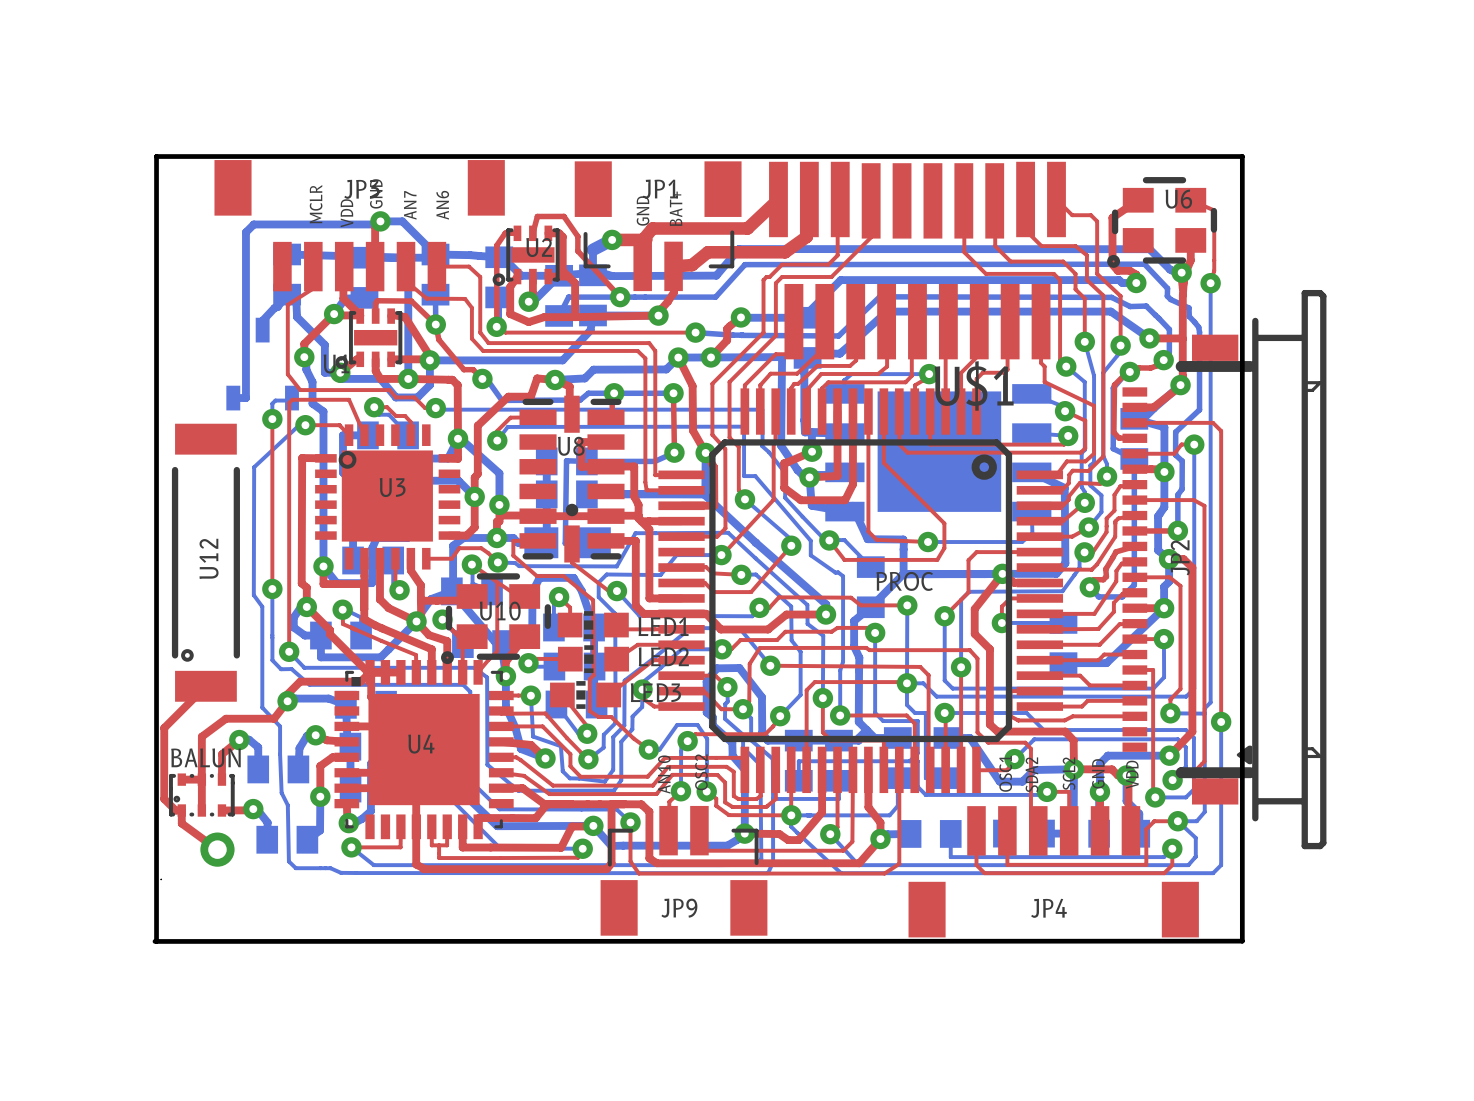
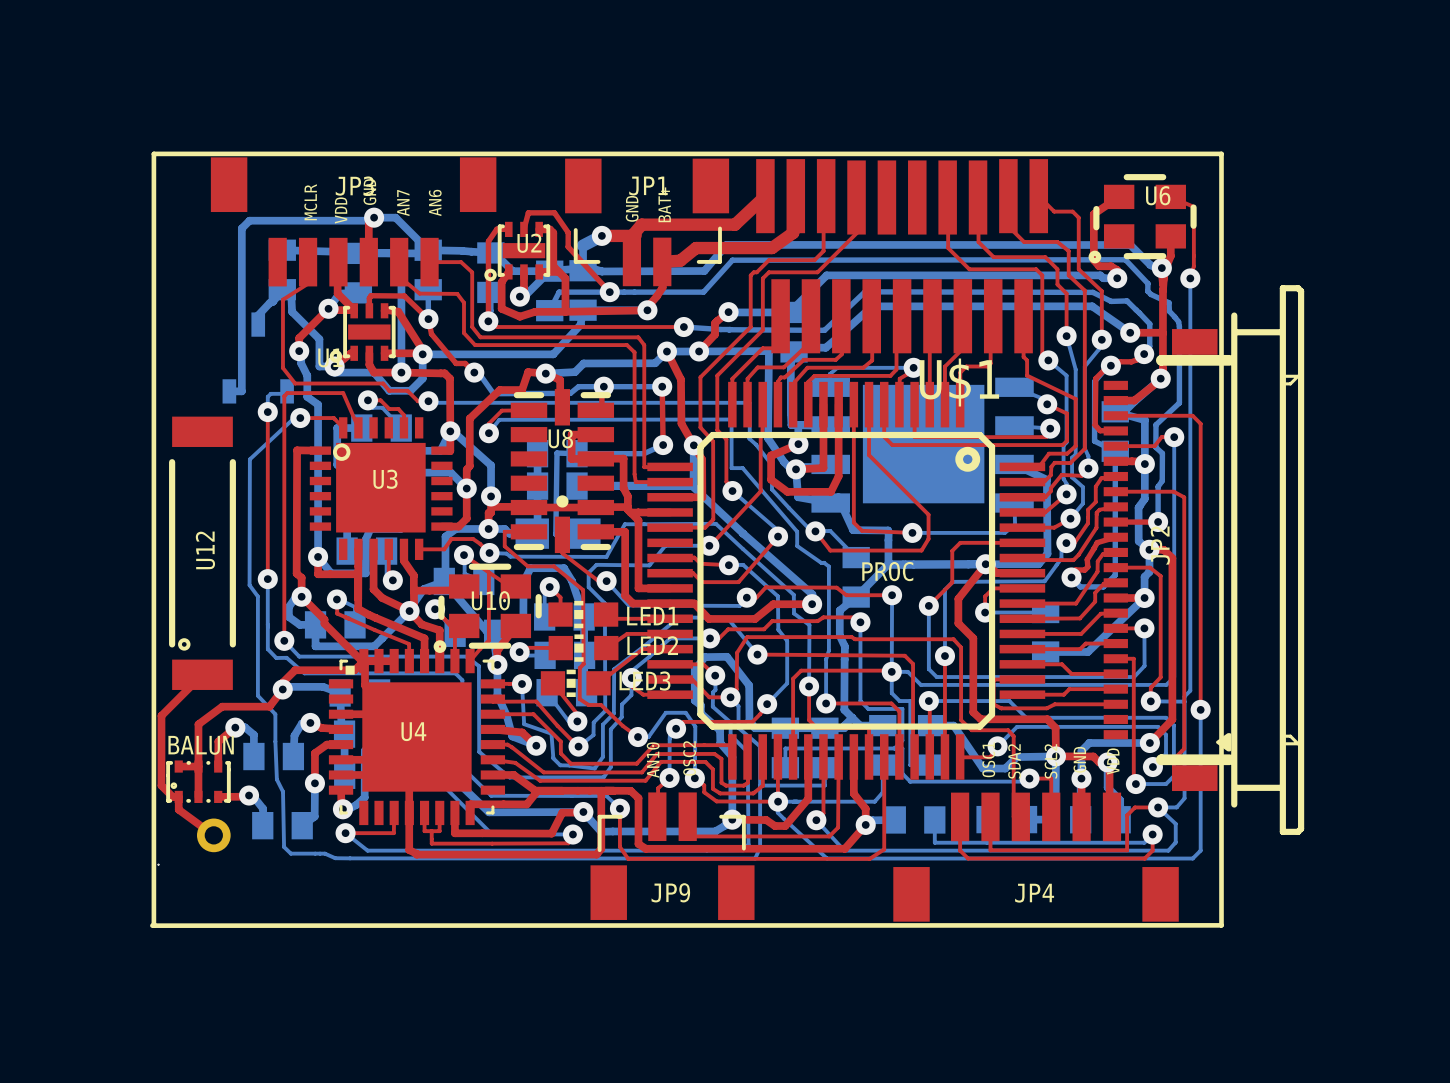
board edge: (156, 941) (156, 156) (1242, 156) (1242, 941) (154, 941) -> none
line: none -> (153, 925) (153, 153) (1221, 153) (1221, 925) (152, 925)

